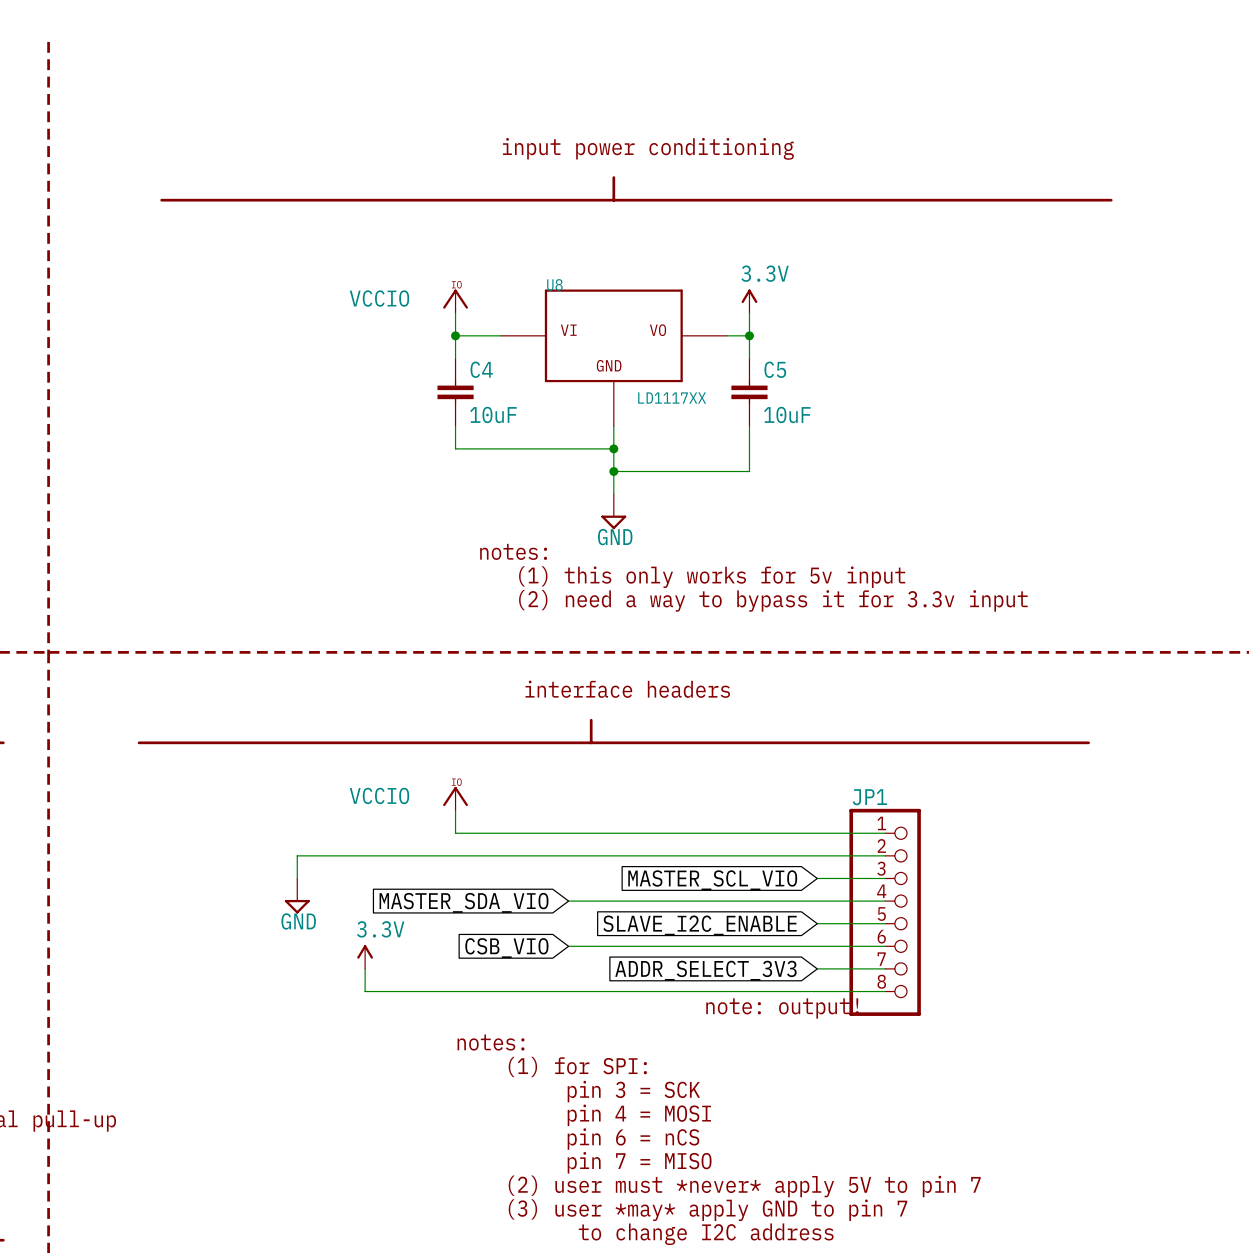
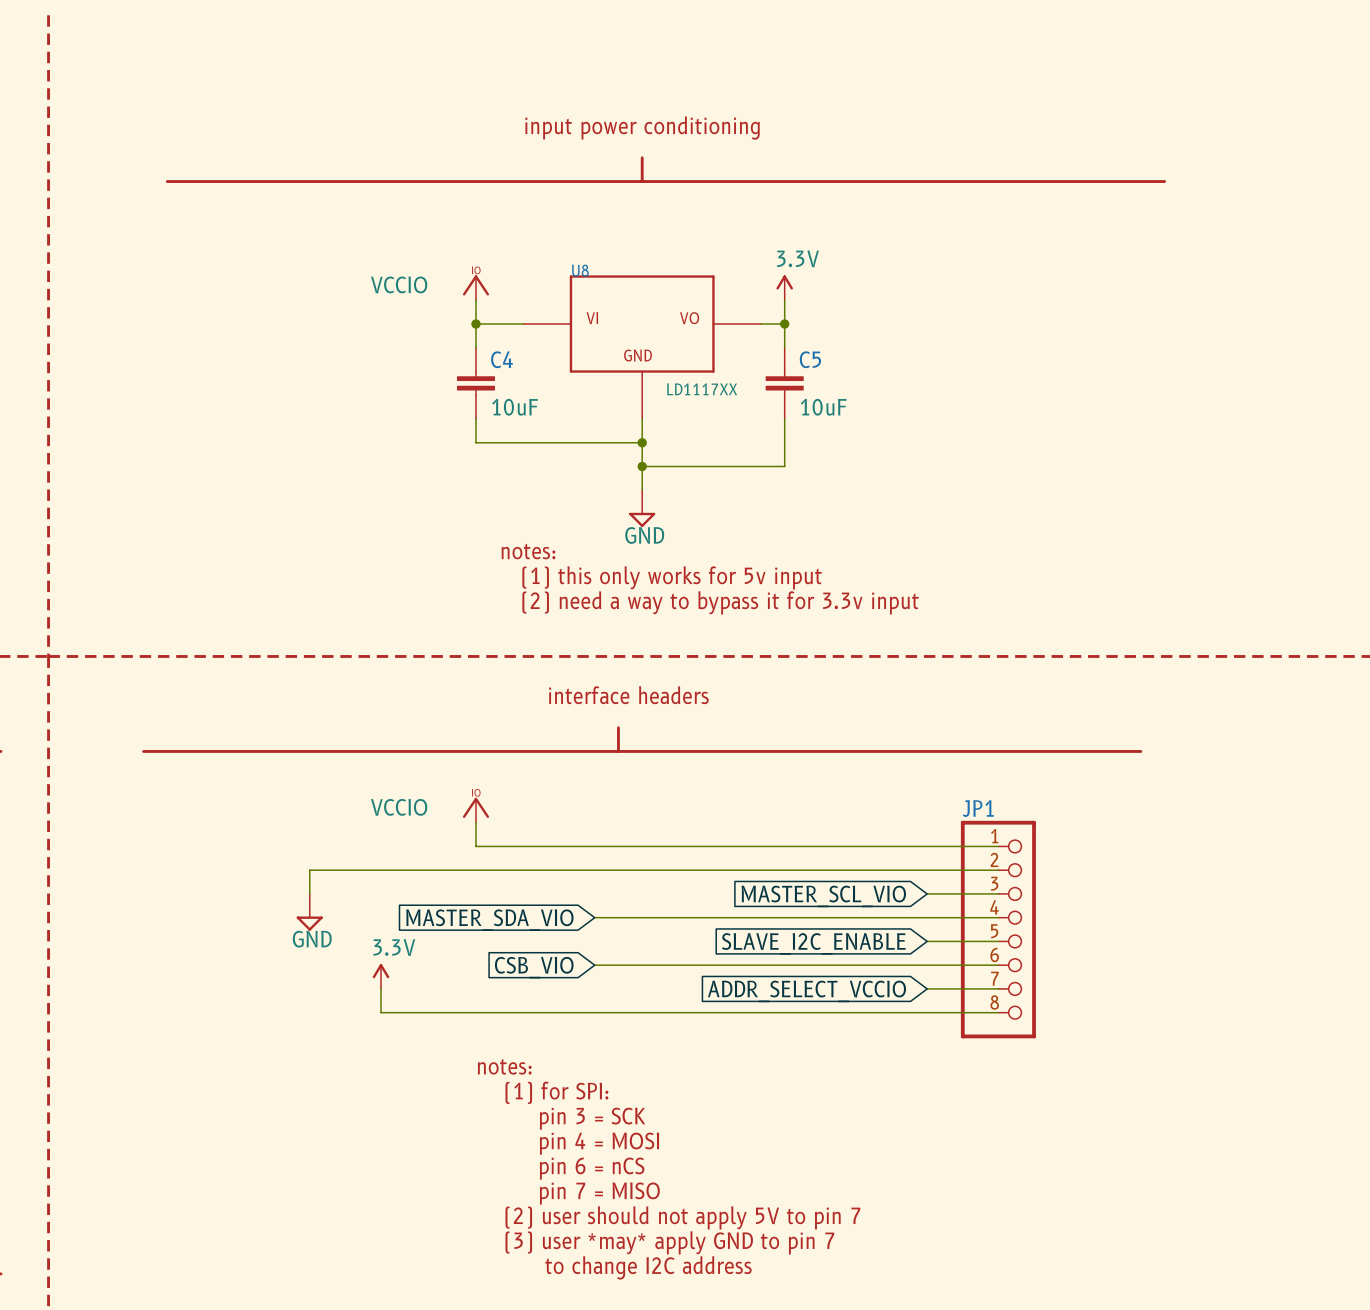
wire: none -> (927, 846) (998, 846)
wire: none -> (927, 870) (998, 870)
wire: (817, 878) (885, 878) -> (998, 893) (927, 893)
global label position: MASTER_SCL_VIO (712, 880) -> MASTER_SCL_VIO (823, 896)
wire: none -> (927, 917) (998, 917)
JP1 position: (885, 912) -> (998, 929)
wire: (817, 923) (885, 923) -> (998, 941) (927, 941)
global label position: SLAVE_I2C_ENABLE (699, 925) -> SLAVE_I2C_ENABLE (813, 943)
wire: none -> (927, 965) (998, 965)
wire: (817, 968) (885, 968) -> (998, 988) (927, 988)
global label: ADDR_SELECT_3V3 (705, 970) -> ADDR_SELECT_VCCIO (807, 991)
wire: none -> (927, 1012) (998, 1012)
text: note: output! (782, 1008) -> none
text: (2) user must *never* apply 5V to pin 7 (744, 1186) -> (2) user should not apply 5V to pin 7 (682, 1217)

